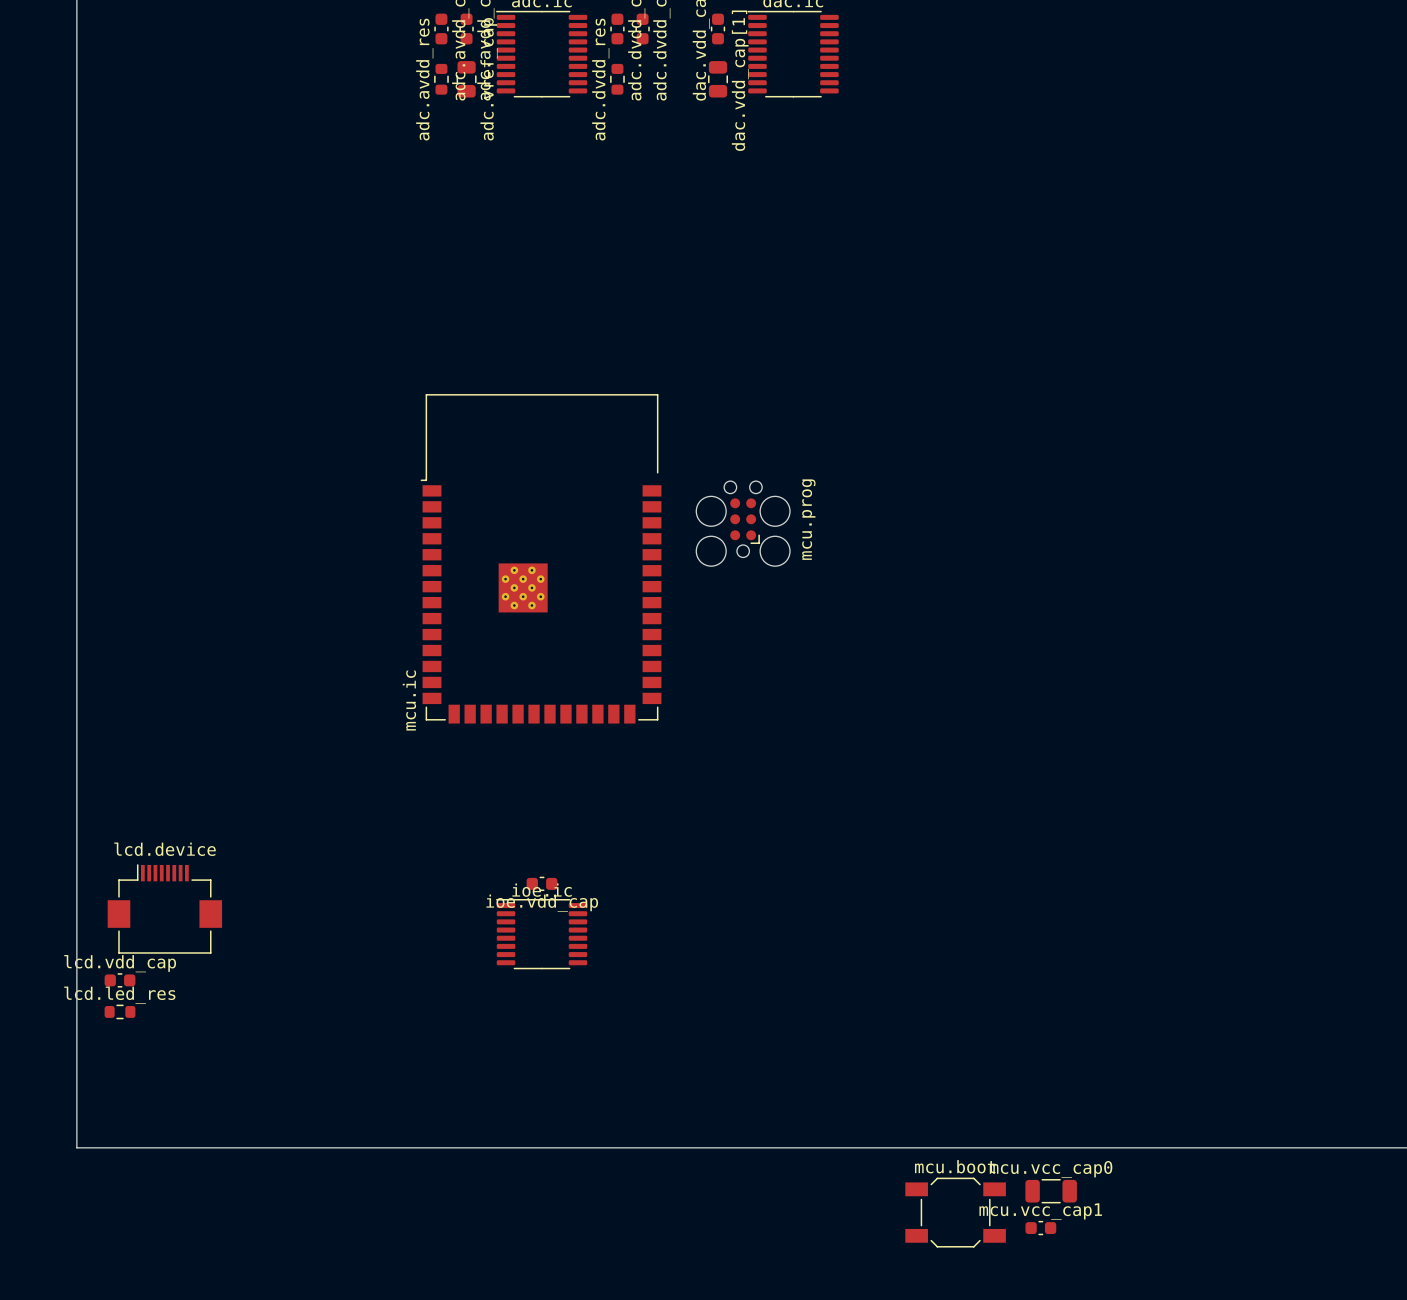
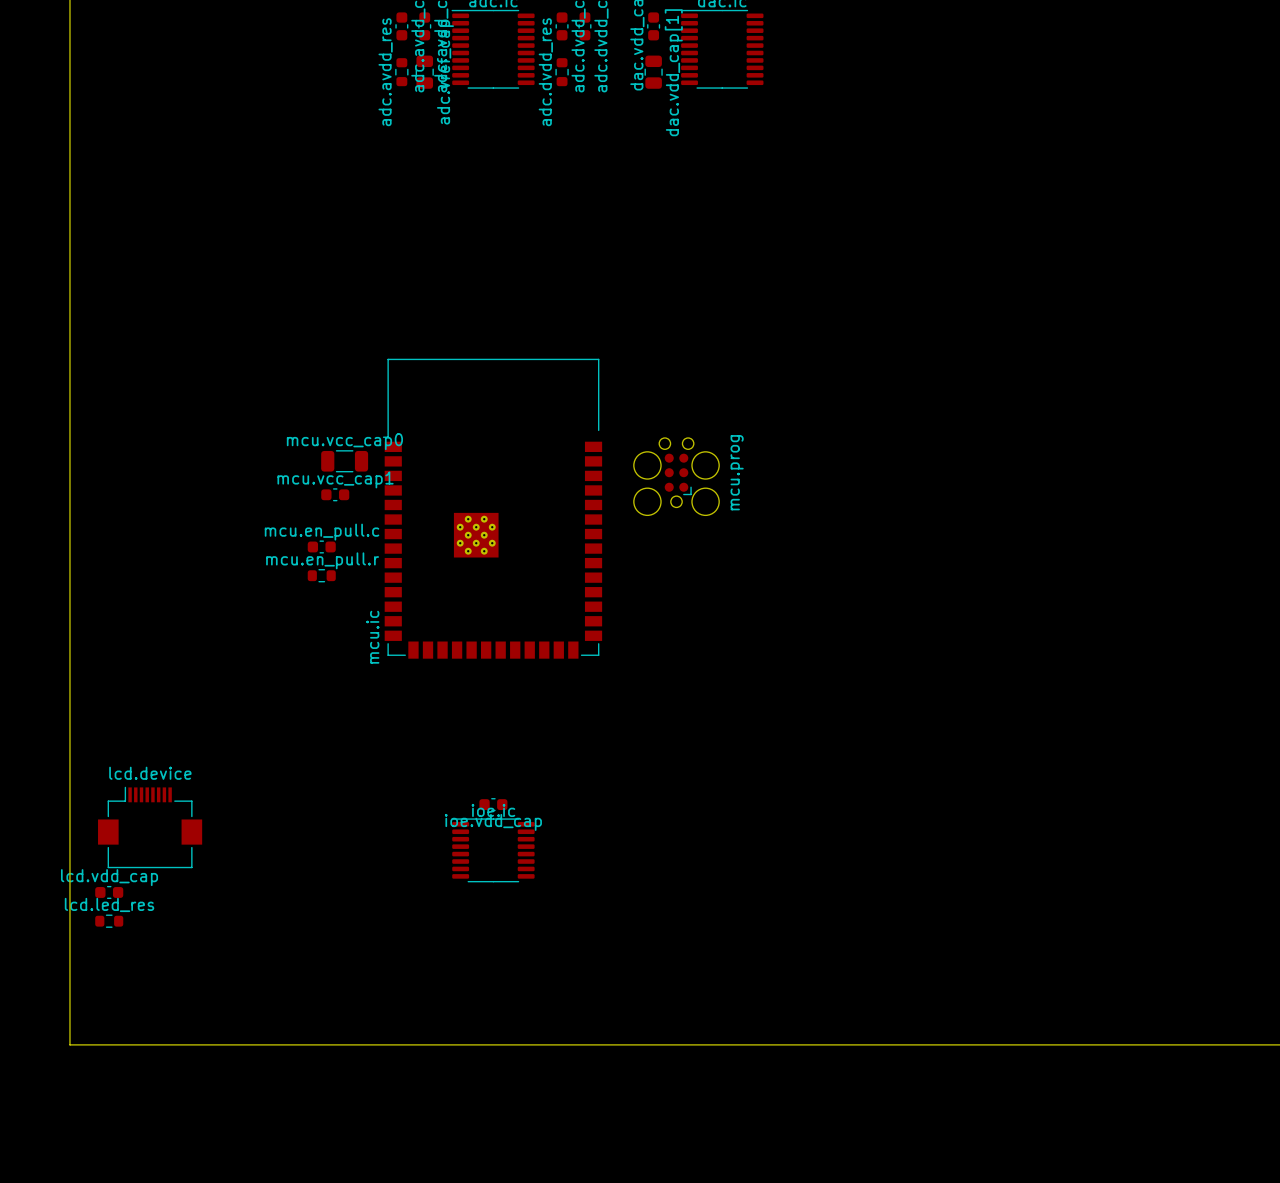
mcu.en_pull.c: none -> (321, 546)
mcu.en_pull.r: none -> (321, 575)
mcu.vcc_cap0 position: (1051, 1191) -> (344, 461)
mcu.boot: (955, 1212) -> none
mcu.vcc_cap1 position: (1040, 1228) -> (335, 494)

